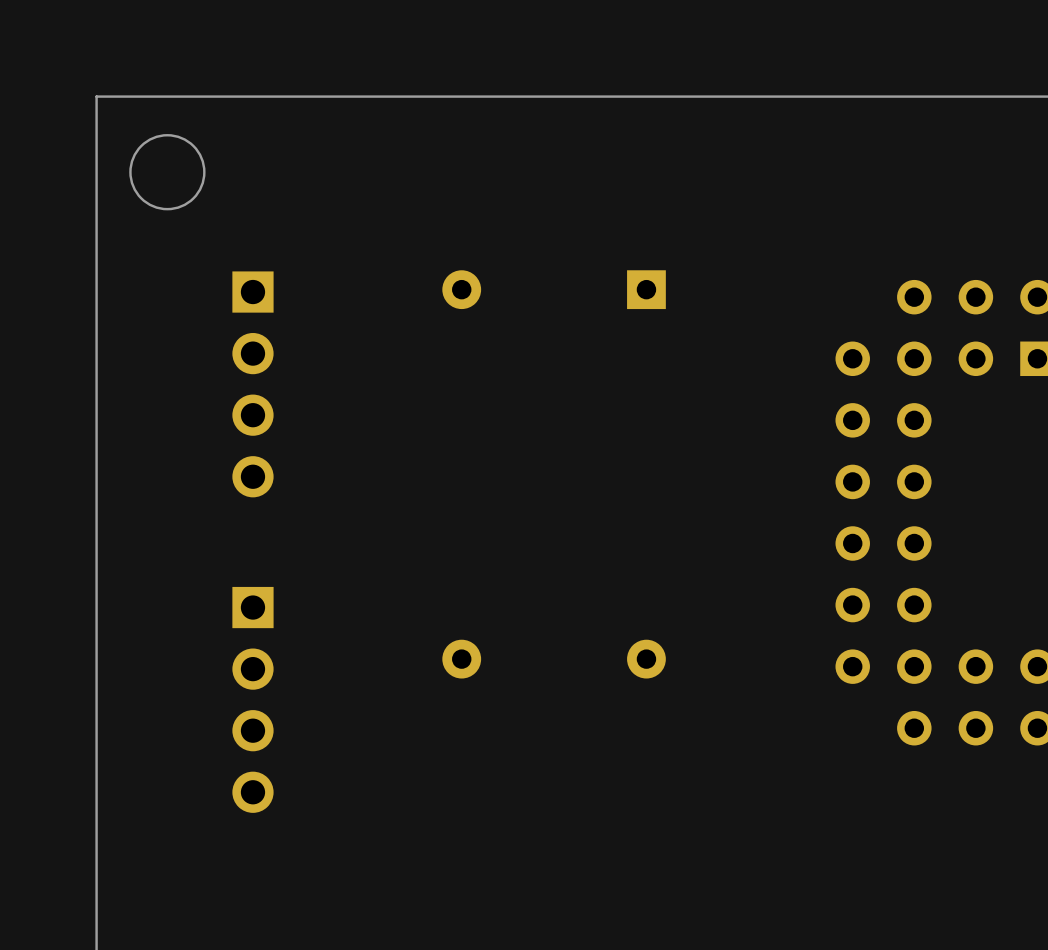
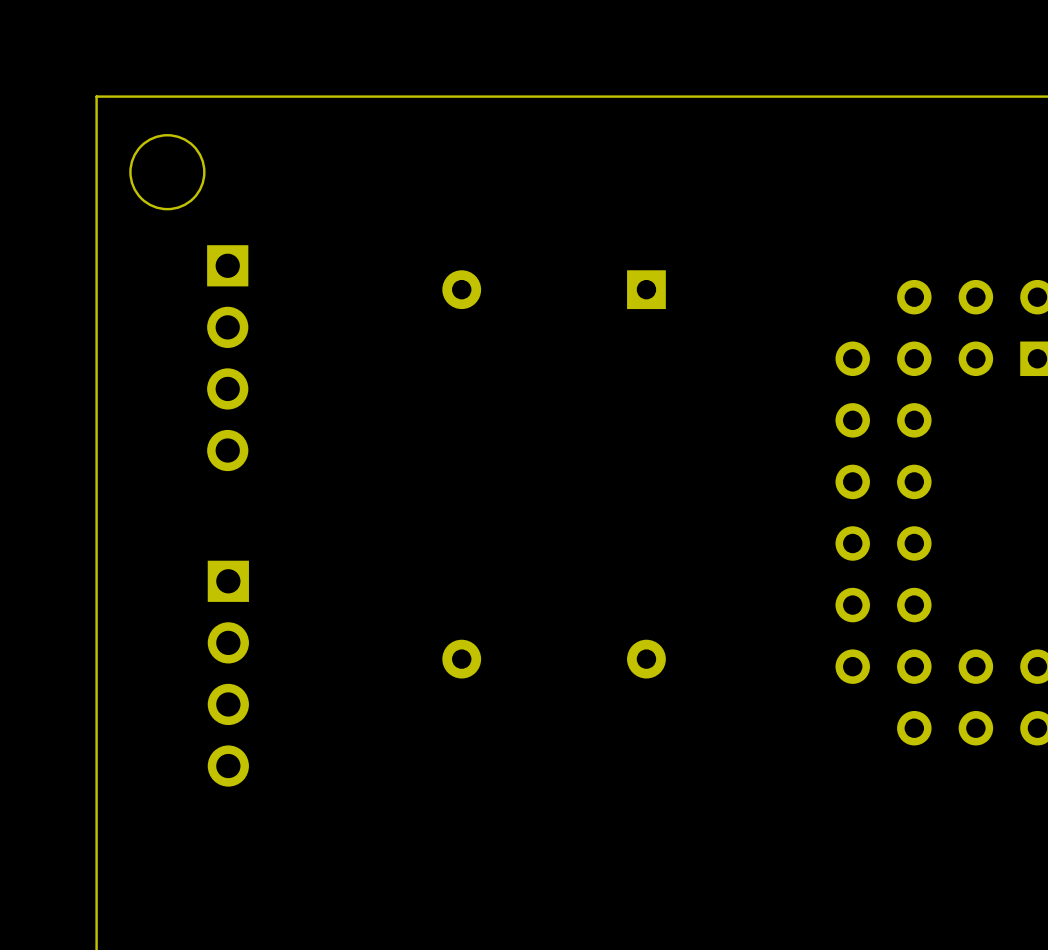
part position: (252, 384) -> (227, 358)
part position: (252, 699) -> (228, 673)

